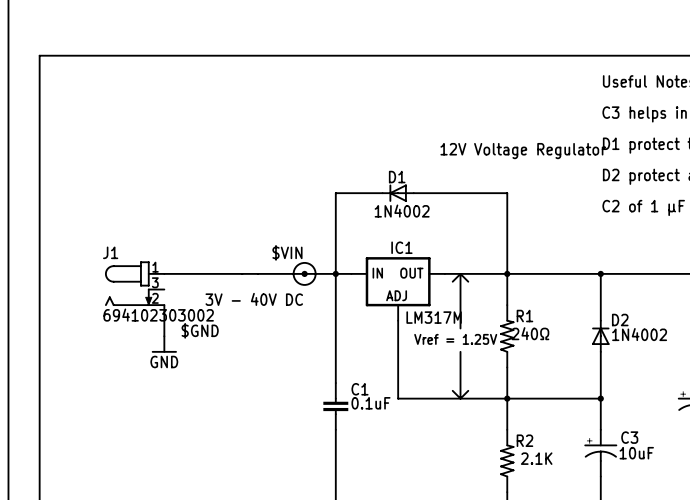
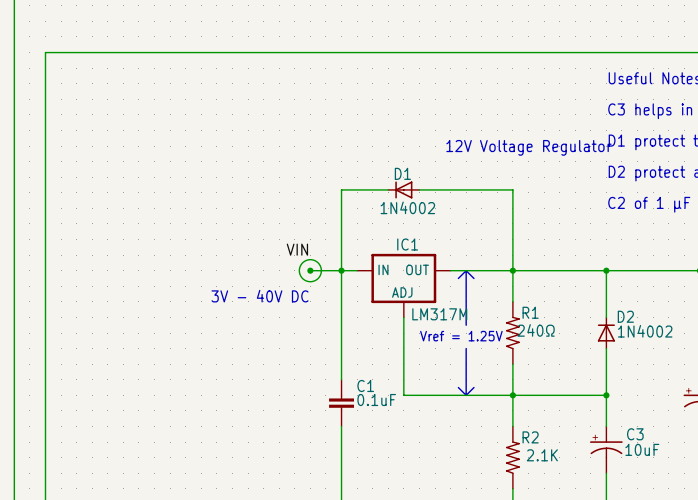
label: $VIN (287, 252) -> VIN (297, 249)
wire: (164, 273) (304, 273) -> none
J1: 694102303002 (134, 283) -> none
wire: (164, 305) (164, 336) -> none
label: $GND (200, 330) -> none
power symbol: GND (164, 344) -> none

